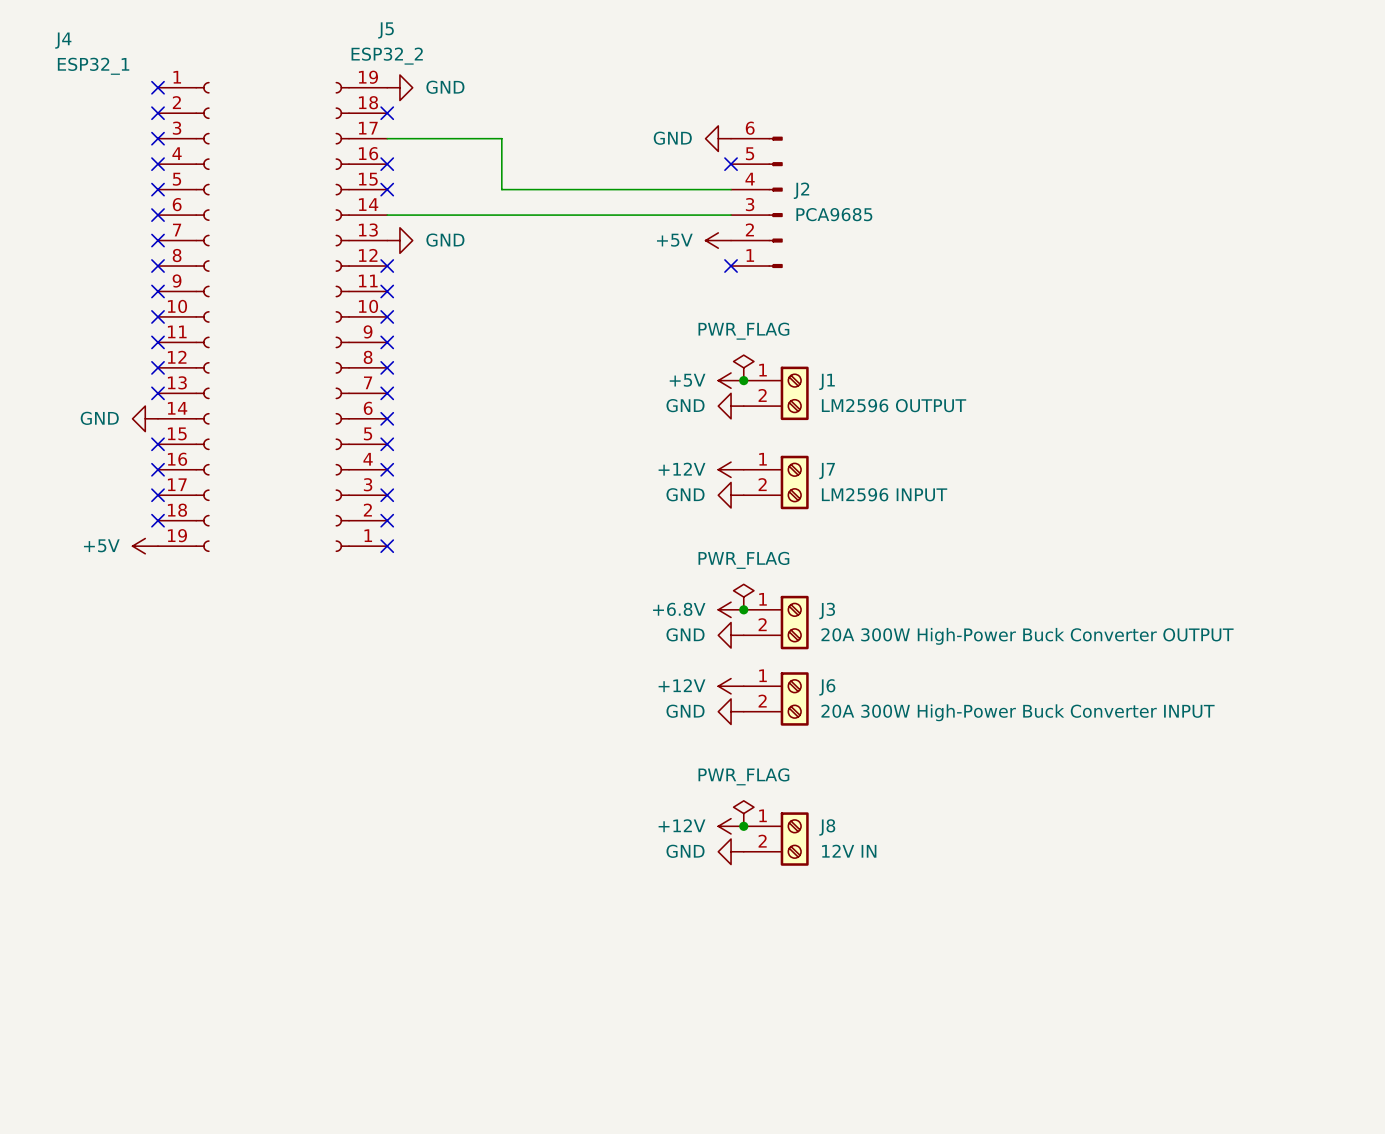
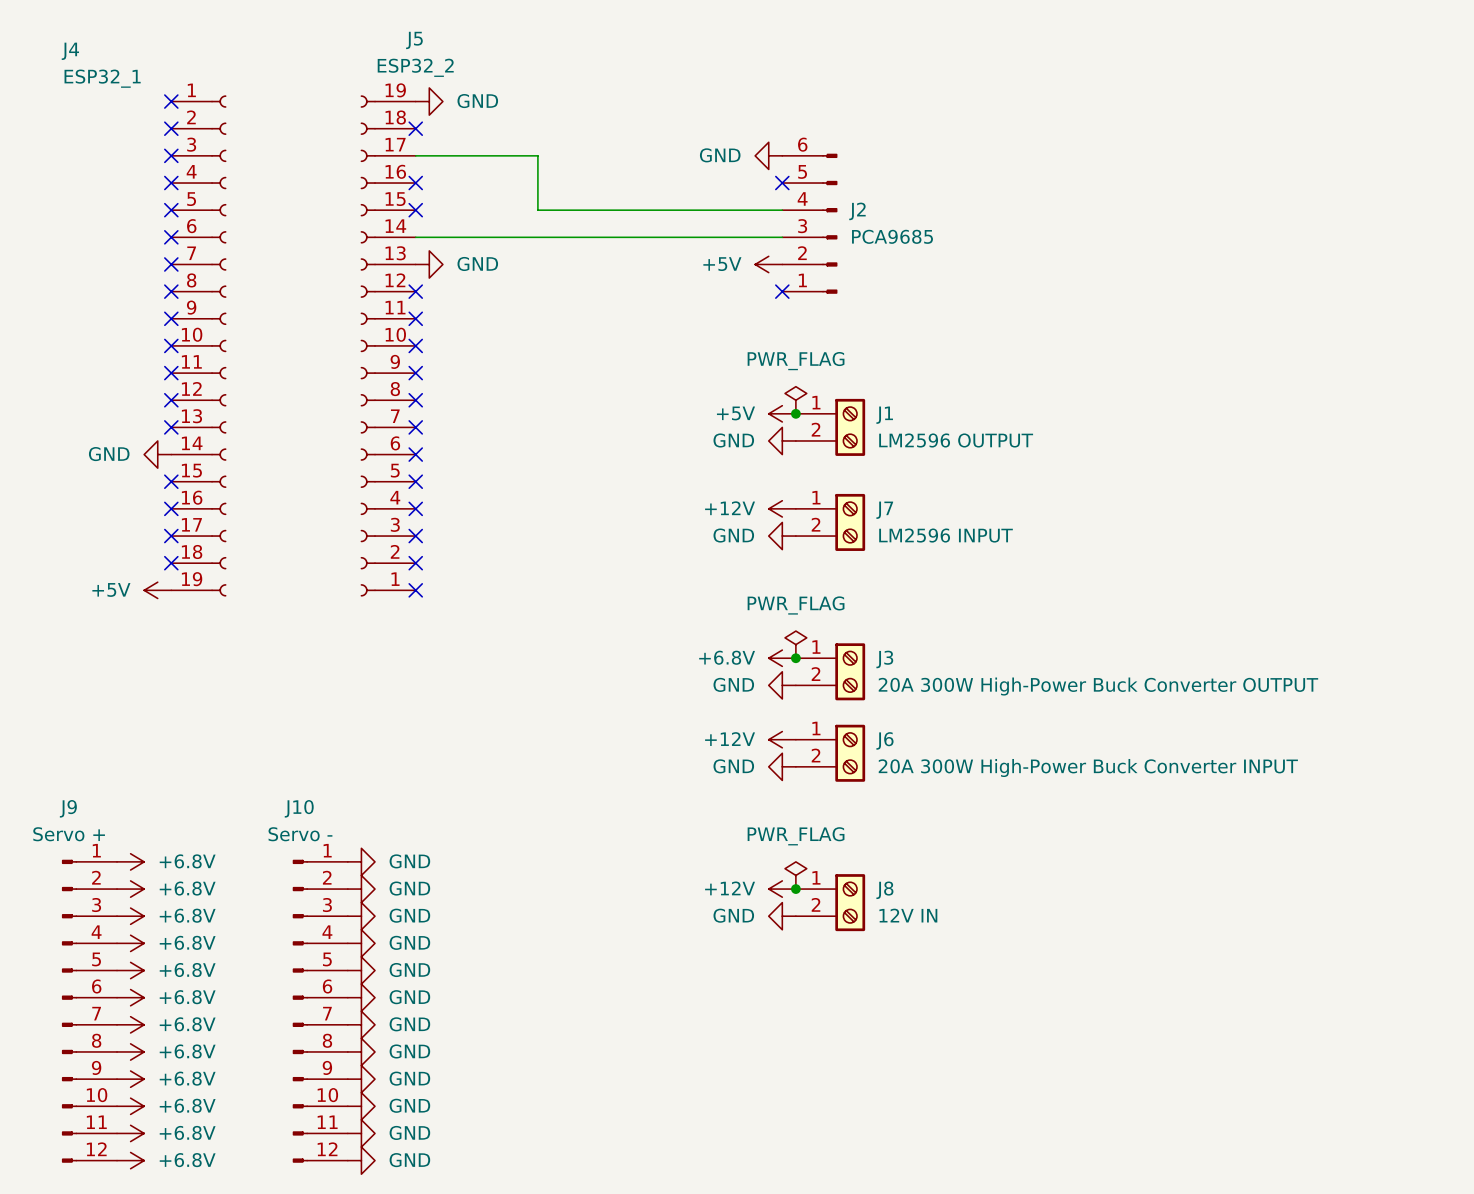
power symbol: none -> +6.8V (130, 861)
power symbol: none -> GND (361, 861)
power symbol: none -> +6.8V (130, 889)
power symbol: none -> GND (361, 889)
power symbol: none -> +6.8V (130, 916)
power symbol: none -> GND (361, 916)
power symbol: none -> +6.8V (130, 943)
power symbol: none -> GND (361, 943)
power symbol: none -> +6.8V (130, 970)
power symbol: none -> GND (361, 970)
power symbol: none -> +6.8V (130, 997)
power symbol: none -> GND (361, 997)
J9: none -> Servo + (89, 1011)
J10: none -> Servo - (320, 1011)
power symbol: none -> +6.8V (130, 1024)
power symbol: none -> GND (361, 1024)
power symbol: none -> +6.8V (130, 1051)
power symbol: none -> GND (361, 1051)
power symbol: none -> +6.8V (130, 1079)
power symbol: none -> GND (361, 1079)
power symbol: none -> +6.8V (130, 1106)
power symbol: none -> GND (361, 1106)
power symbol: none -> +6.8V (130, 1133)
power symbol: none -> GND (361, 1133)
power symbol: none -> +6.8V (130, 1160)
power symbol: none -> GND (361, 1160)

